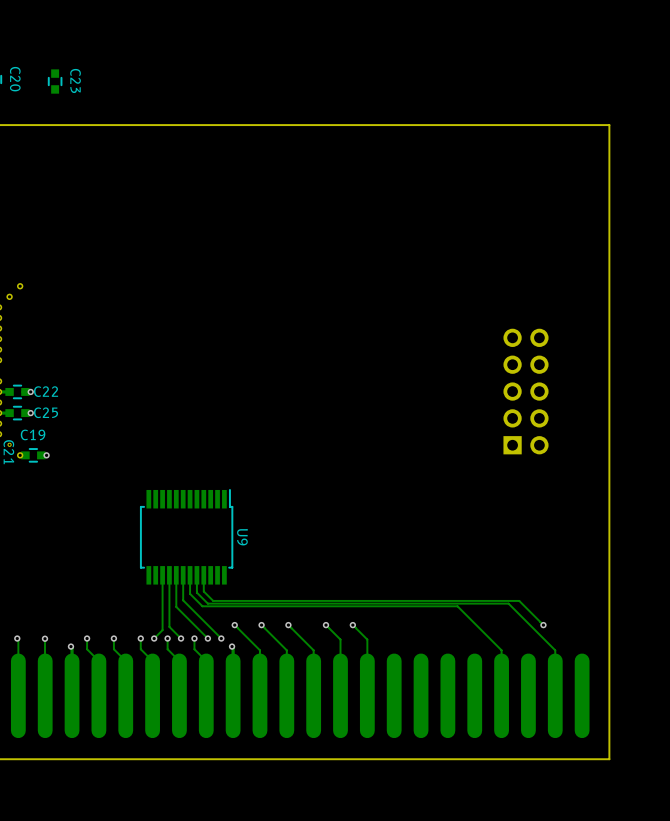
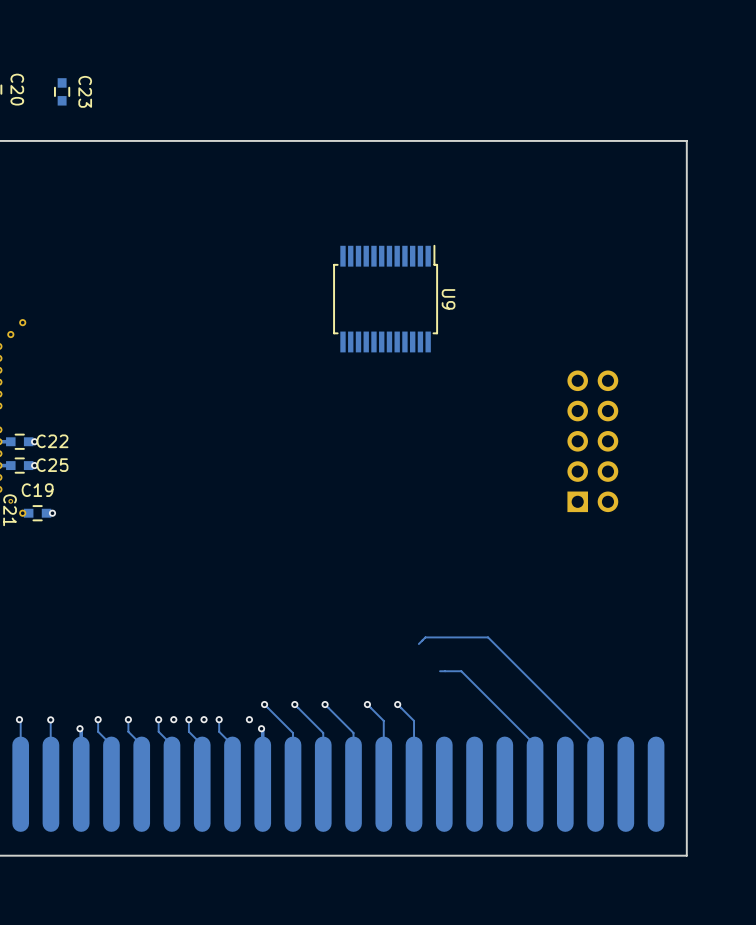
U9 position: (186, 536) -> (385, 298)
track: none -> (418, 644) (425, 637) (488, 637) (595, 744) (595, 784)
track: (162, 575) (162, 630) (154, 638) -> none
track: (169, 575) (169, 626) (181, 638) -> none
track: (176, 575) (176, 606) (207, 638) -> none
track: (183, 575) (183, 600) (221, 638) -> none
track: (190, 575) (190, 593) (202, 606) (457, 606) (501, 650) (501, 695) -> none
track: (196, 575) (196, 592) (207, 603) (508, 603) (555, 650) (555, 695) -> none
track: (203, 575) (203, 591) (213, 600) (519, 600) (543, 625) -> none
track: none -> (440, 671) (461, 671) (535, 744) (535, 784)
via: (543, 625) -> none
via: (207, 638) -> none

